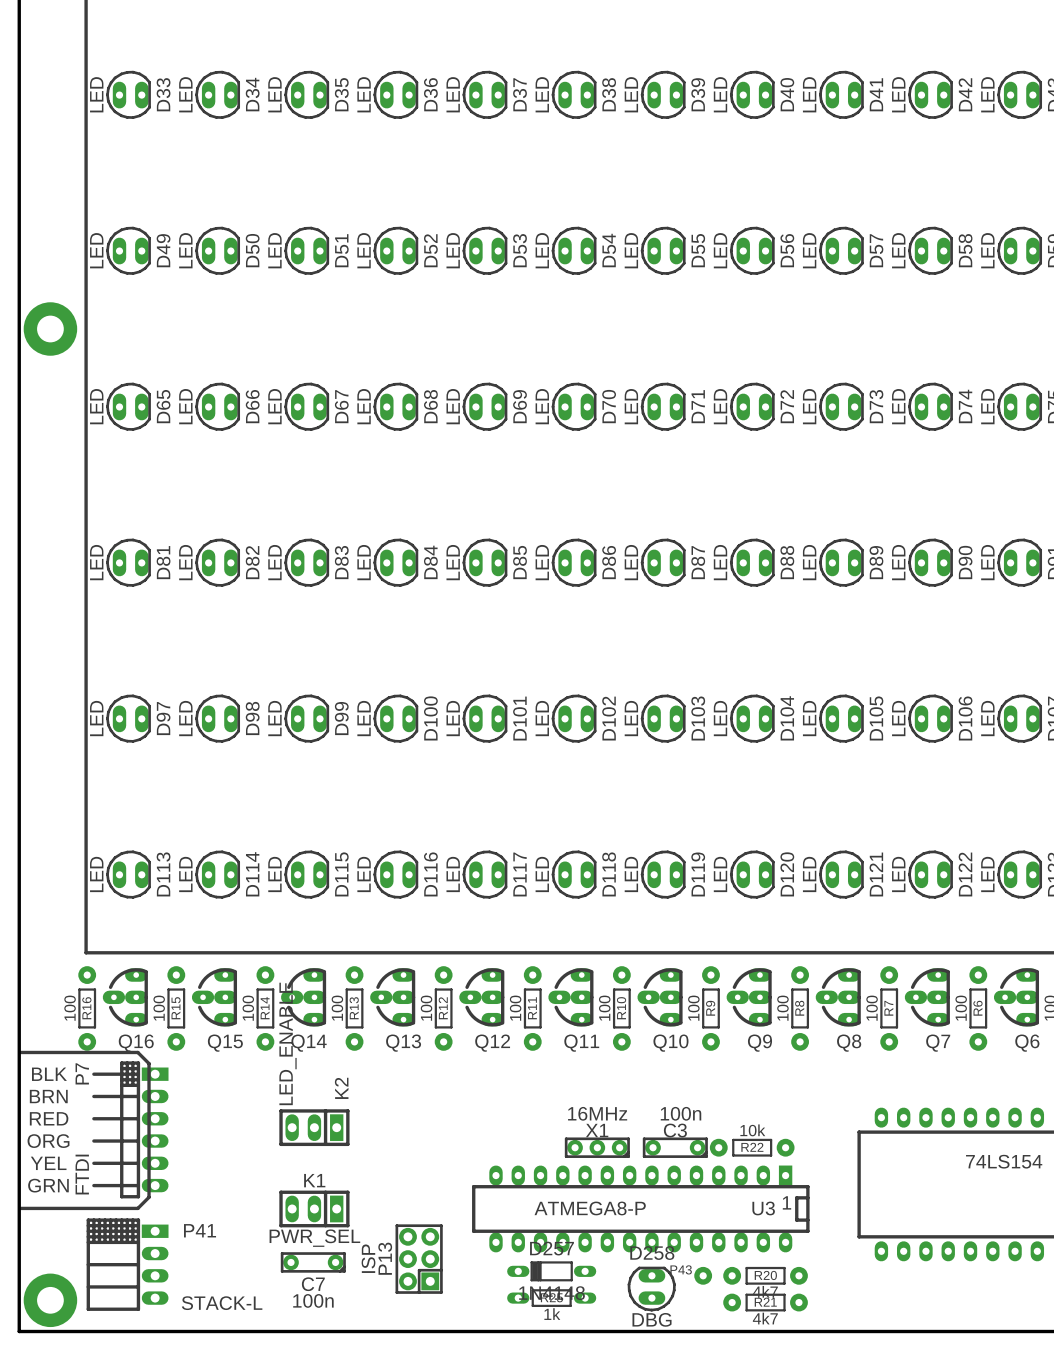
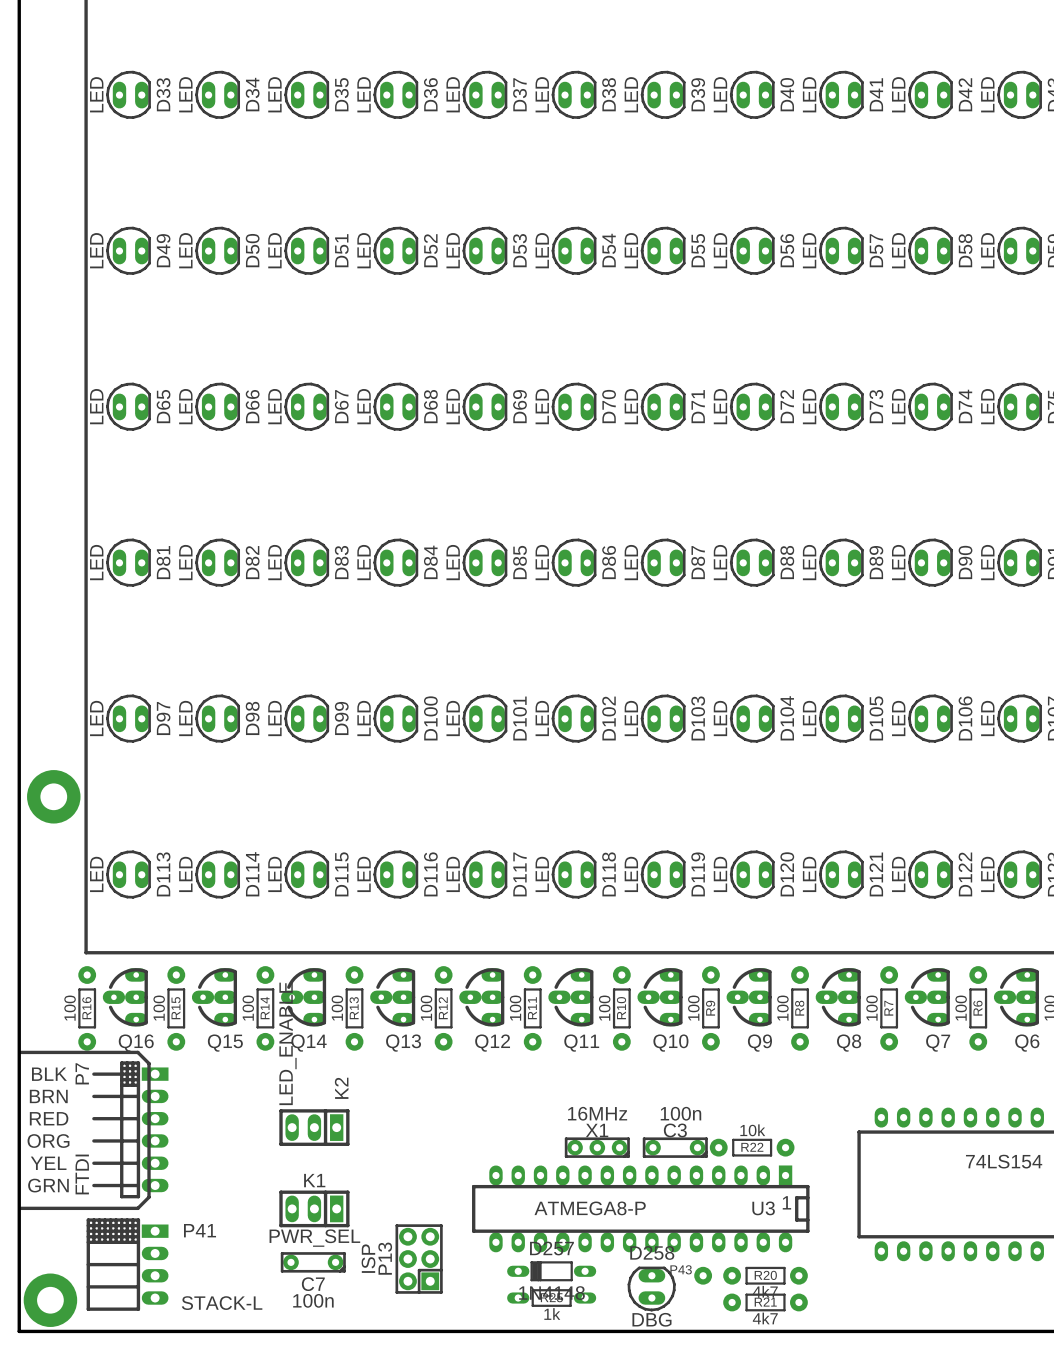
part: (50, 329) -> none
part: none -> (53, 796)

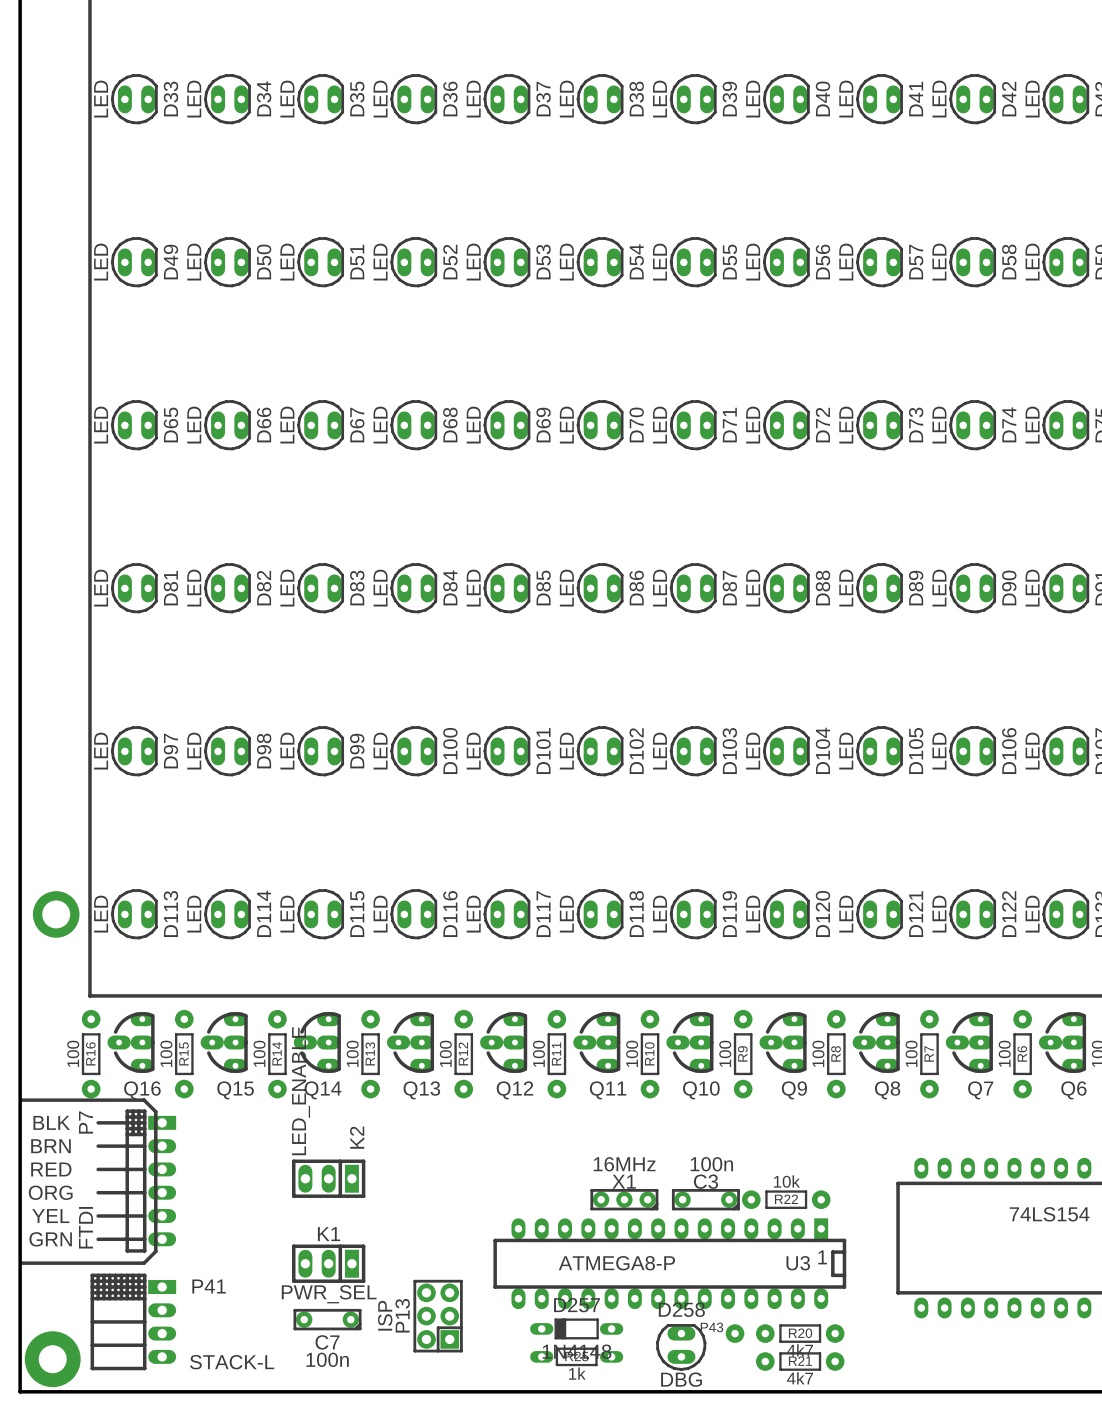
part: (53, 796) -> none
part: none -> (56, 914)

